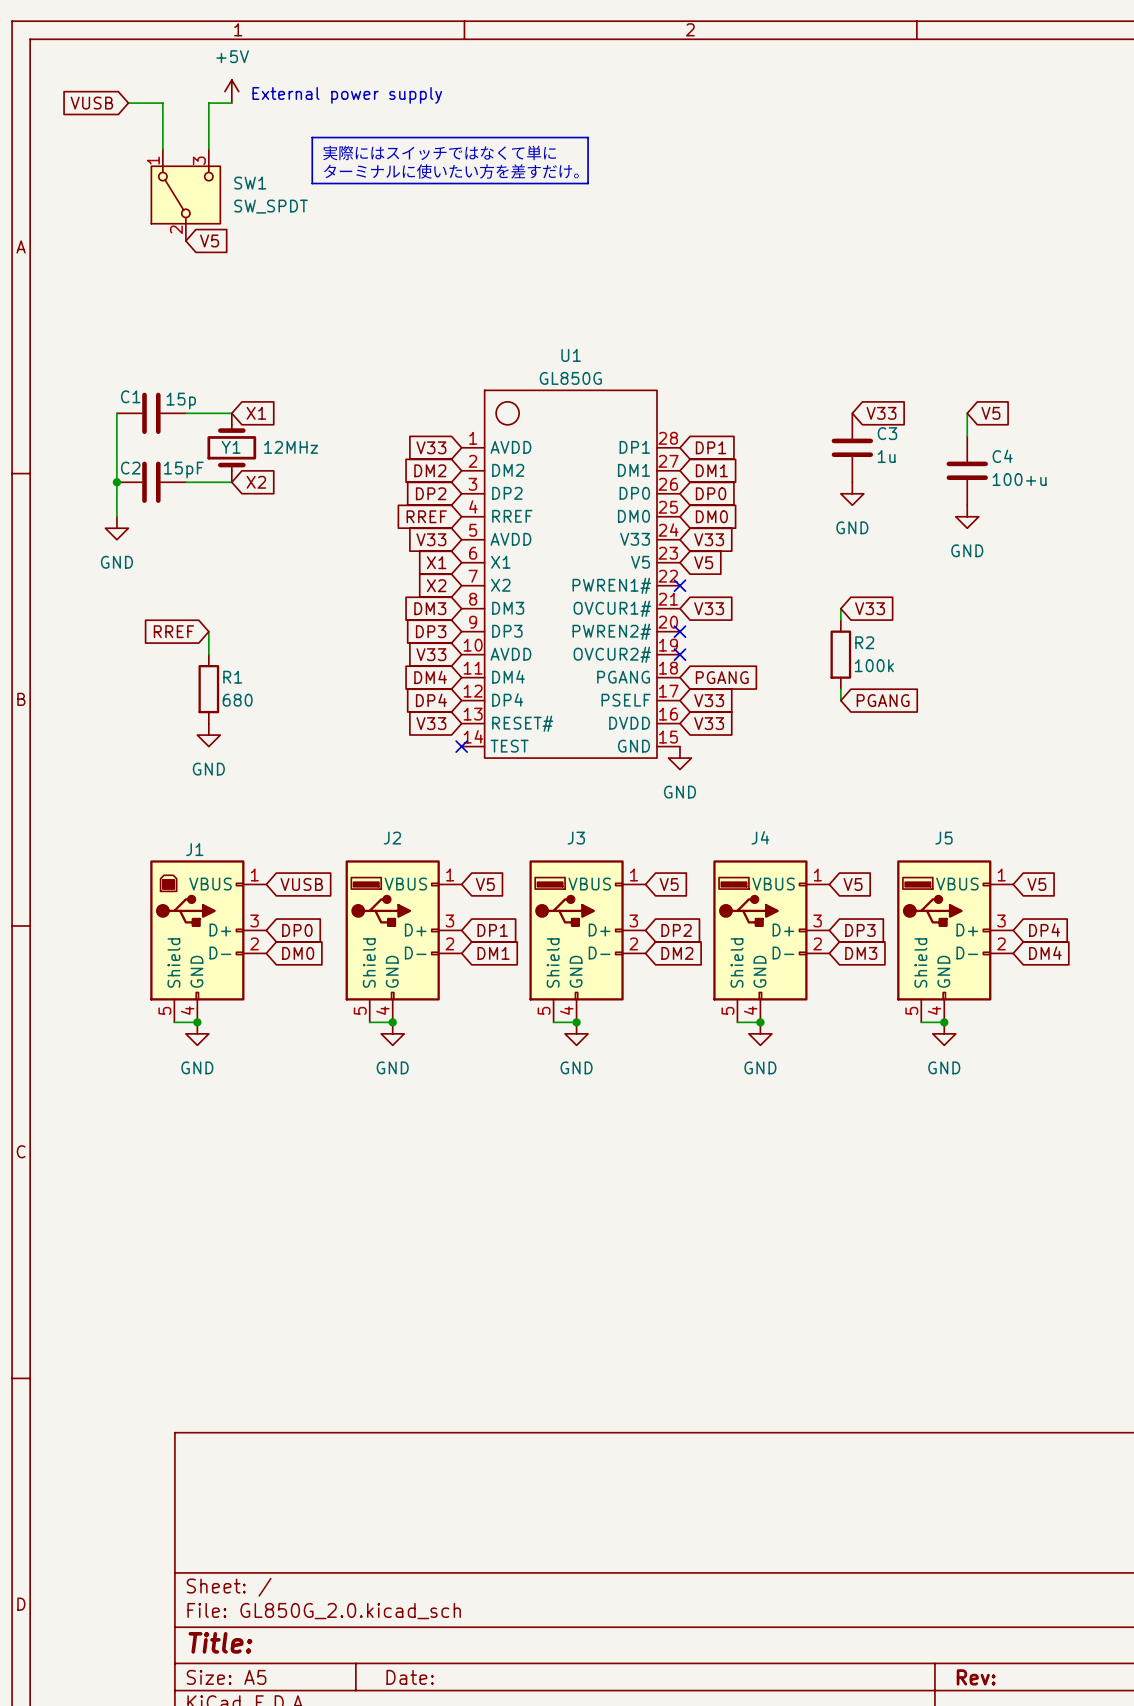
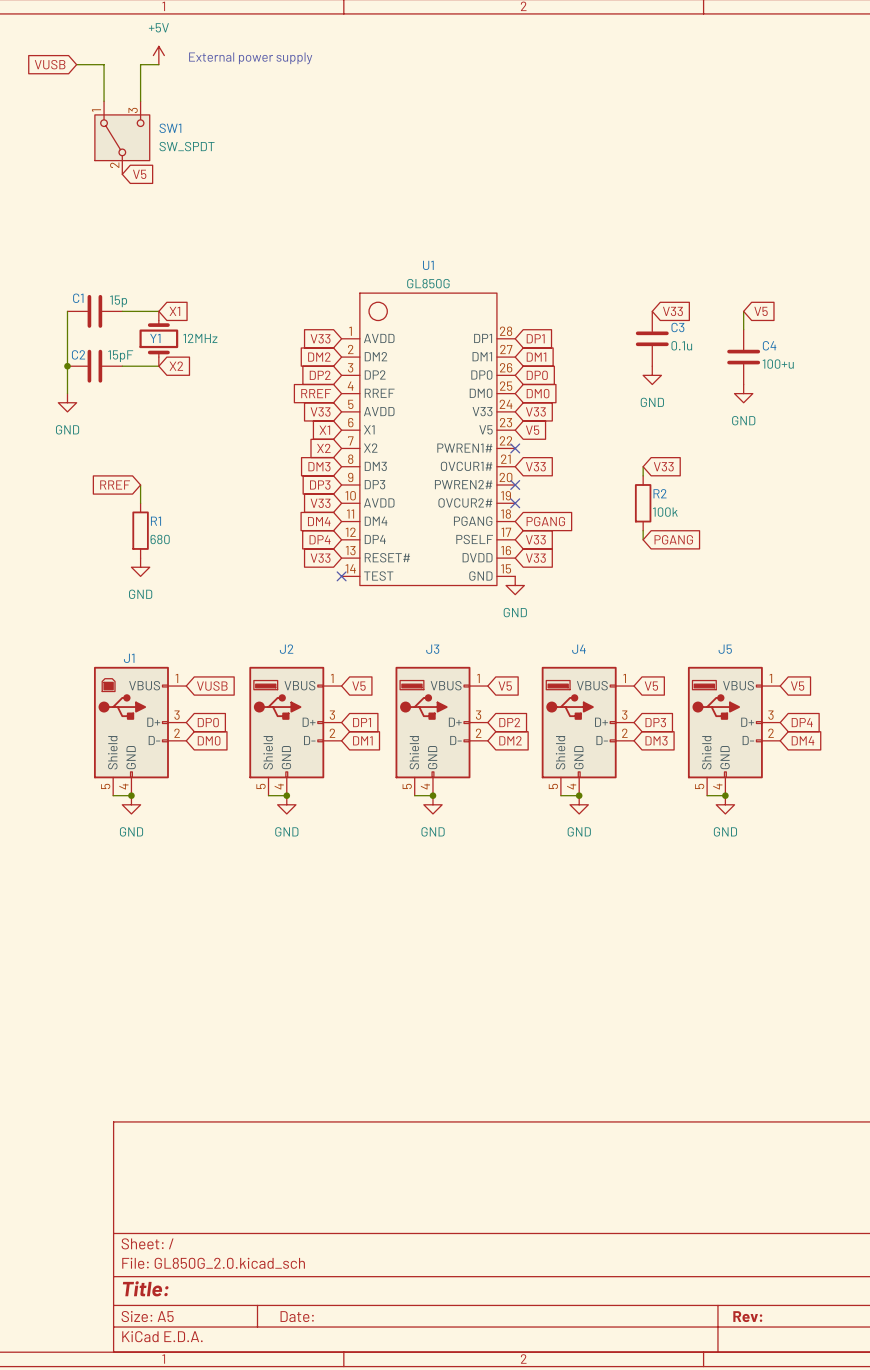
line: (312, 137) (588, 137) (588, 183) (312, 183) (312, 137) -> none
text: 実際にはスイッチではなくて単に (439, 152) -> none
text: ターミナルに使いたい方を差すだけ。 (451, 171) -> none
C3 value: 1u (886, 456) -> 0.1u (681, 345)

